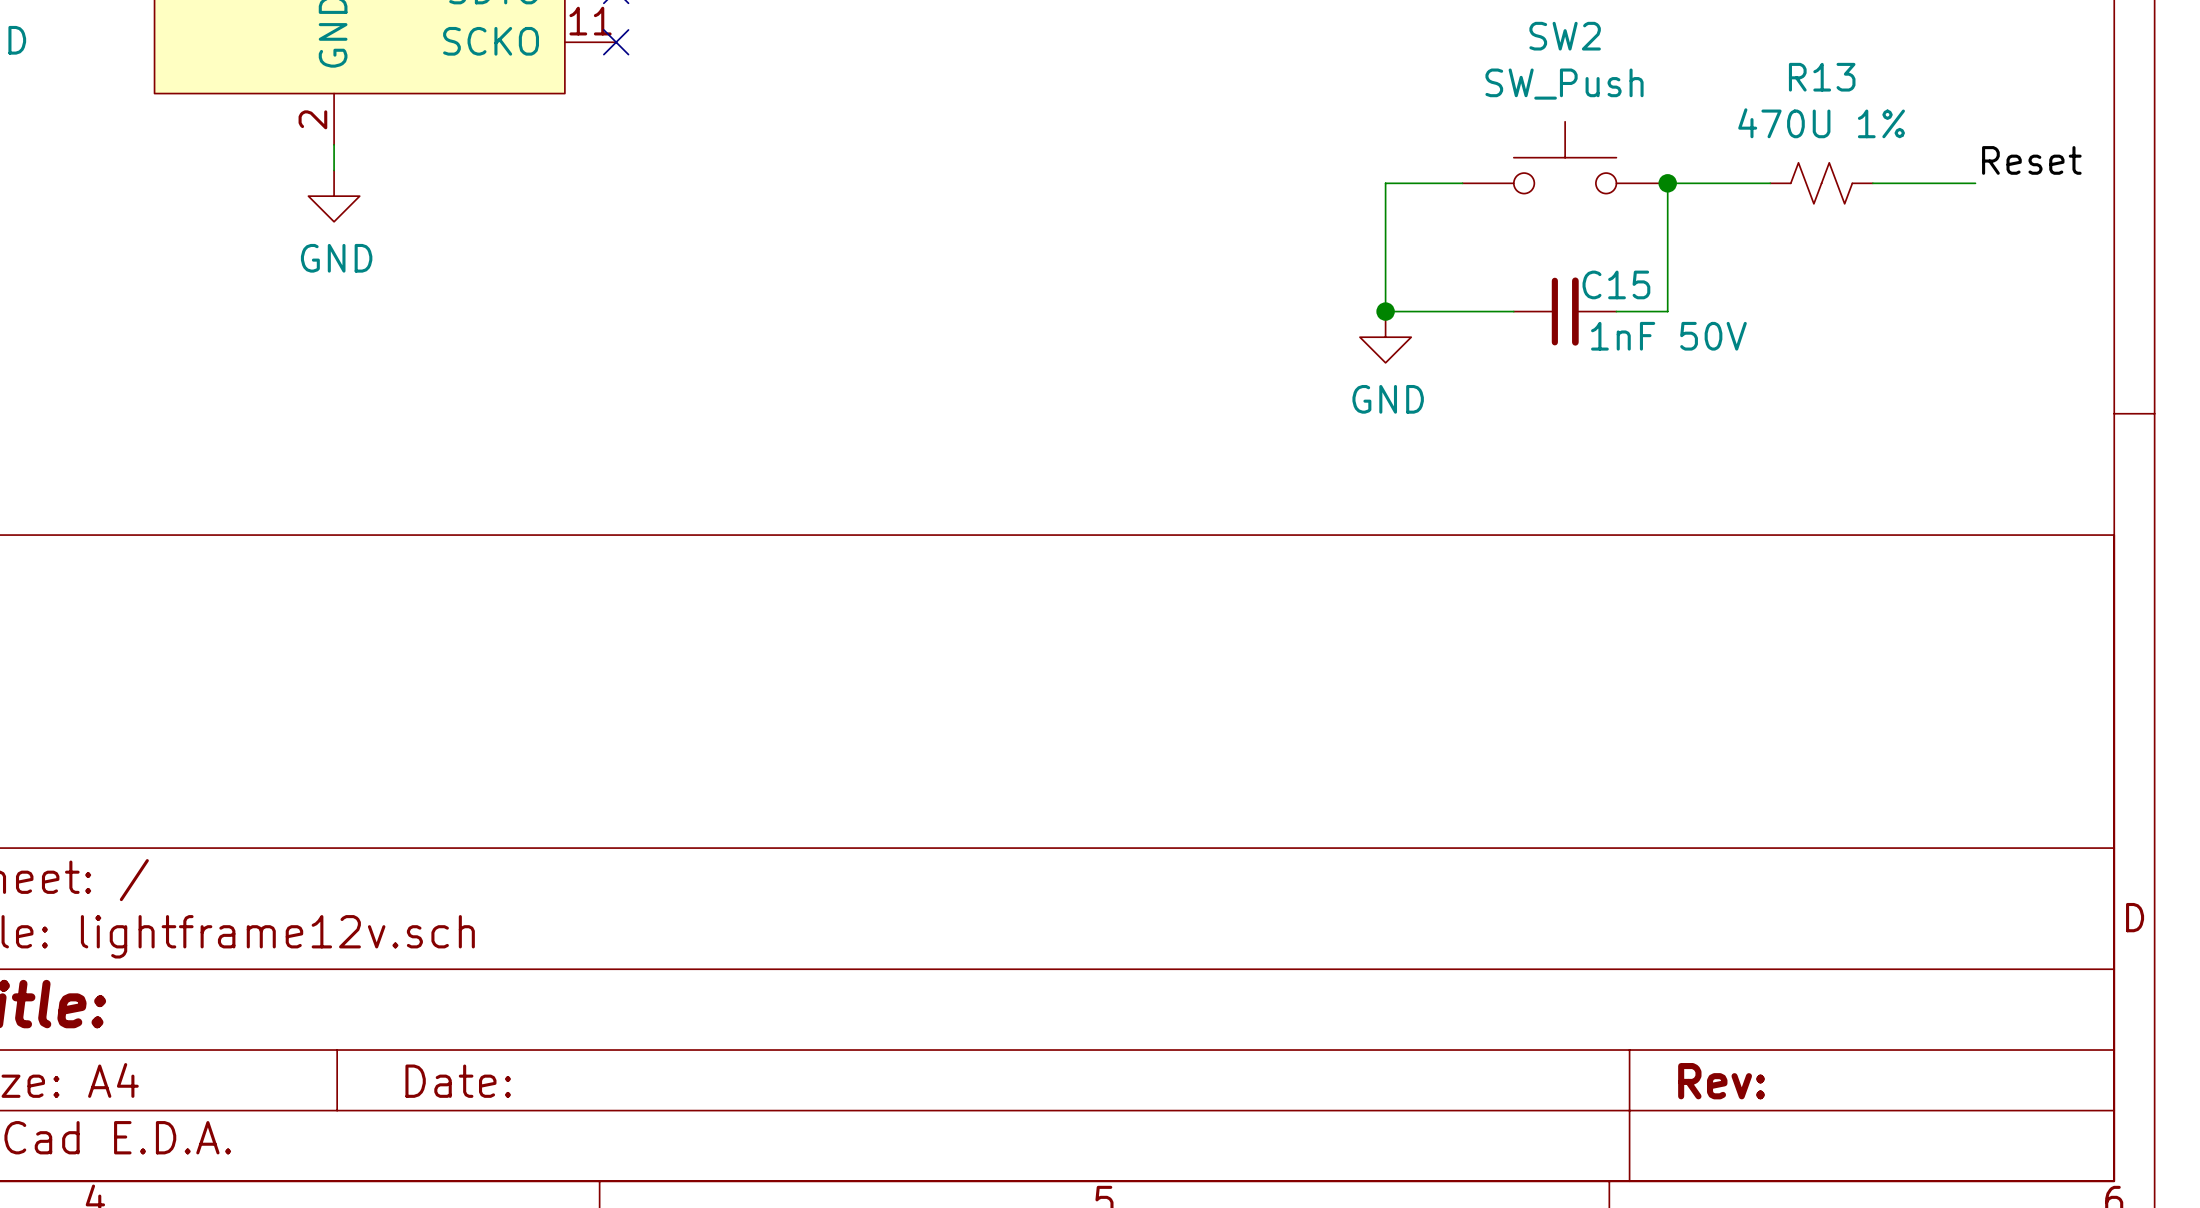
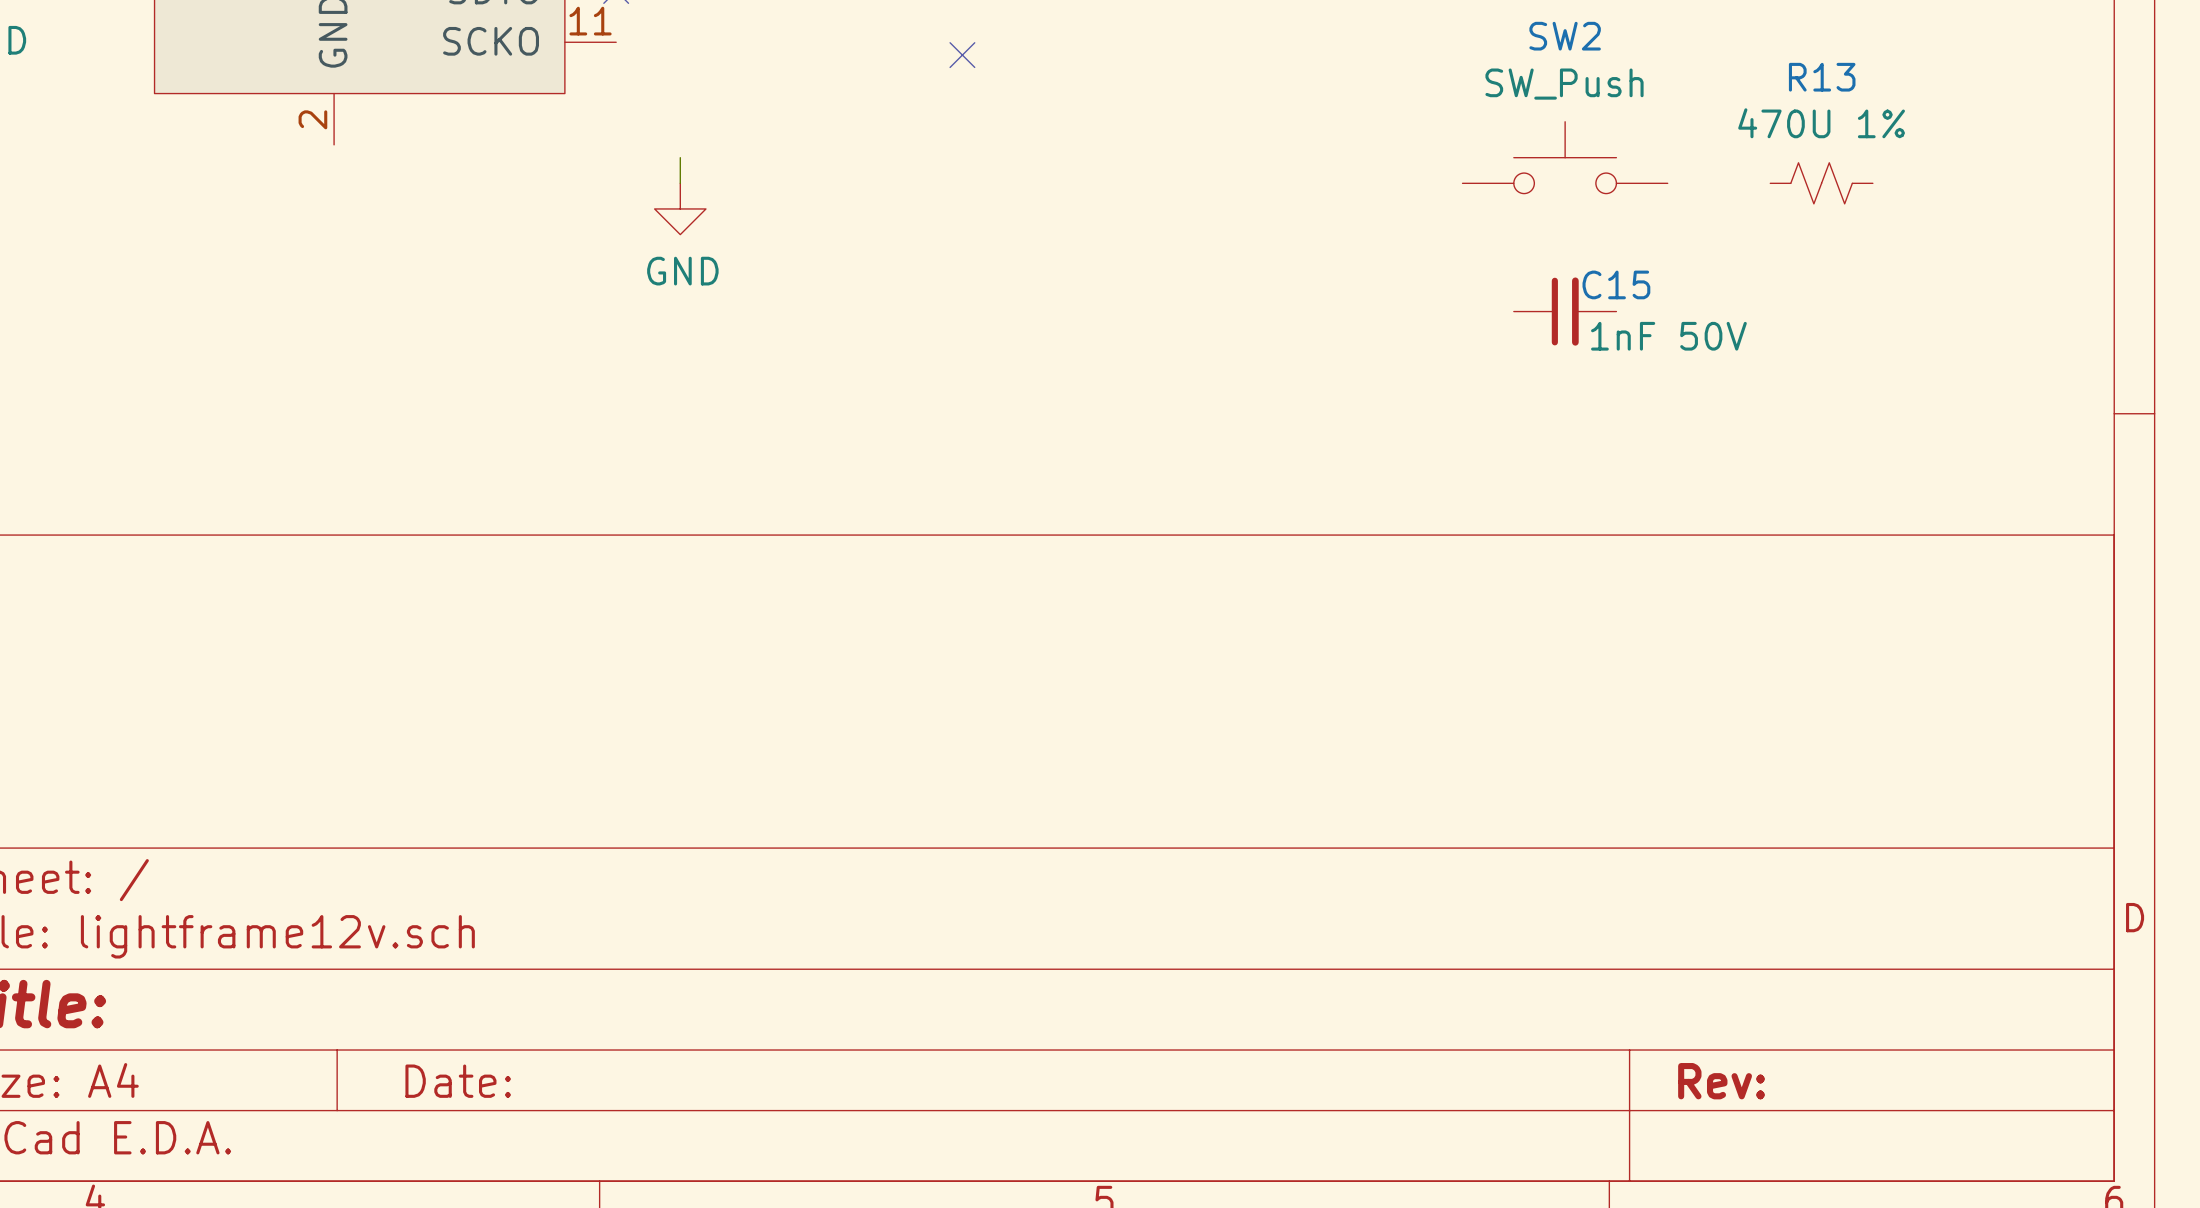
no-connect mark: (616, 42) -> none
no-connect mark: none -> (962, 55)
wire: (334, 144) (334, 170) -> (680, 157) (680, 183)
label: Reset (2031, 160) -> none
wire: (1462, 183) (1385, 183) (1385, 311) (1513, 311) -> none
junction: (1667, 183) -> none
wire: (1770, 183) (1667, 183) (1667, 311) (1616, 311) -> none
wire: (1872, 183) (1975, 183) -> none
power symbol position: GND (334, 196) -> GND (680, 208)
junction: (1385, 311) -> none
power symbol: GND (1385, 337) -> none

